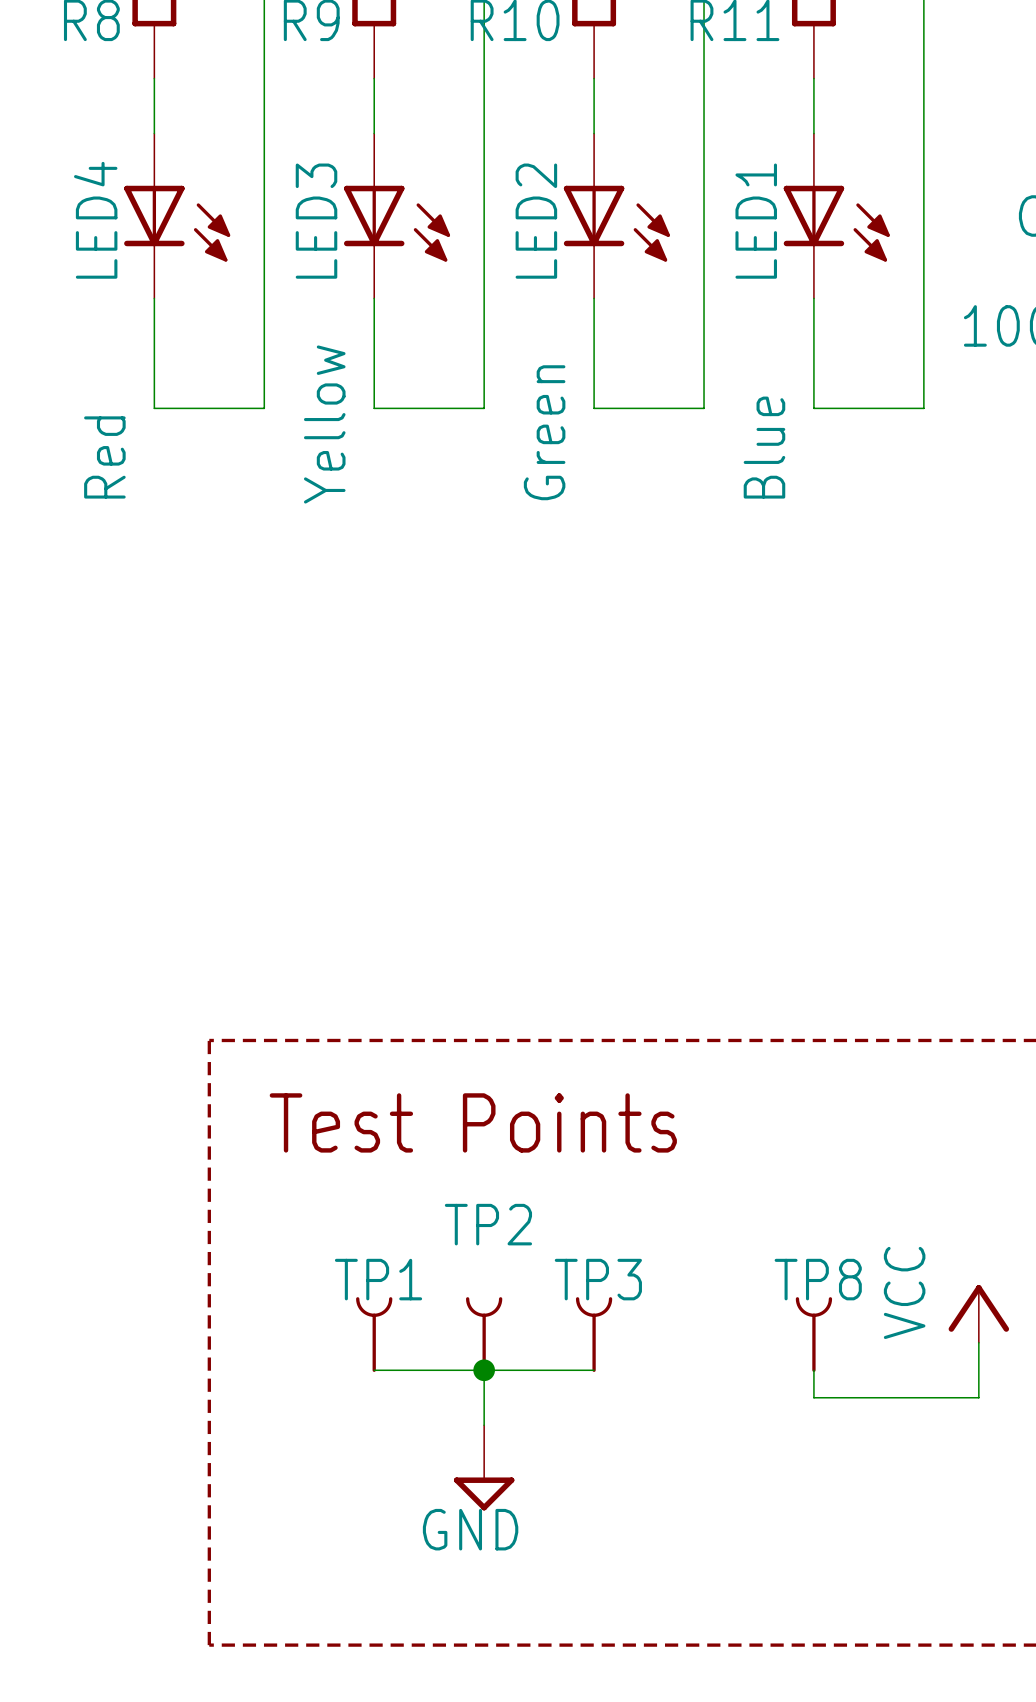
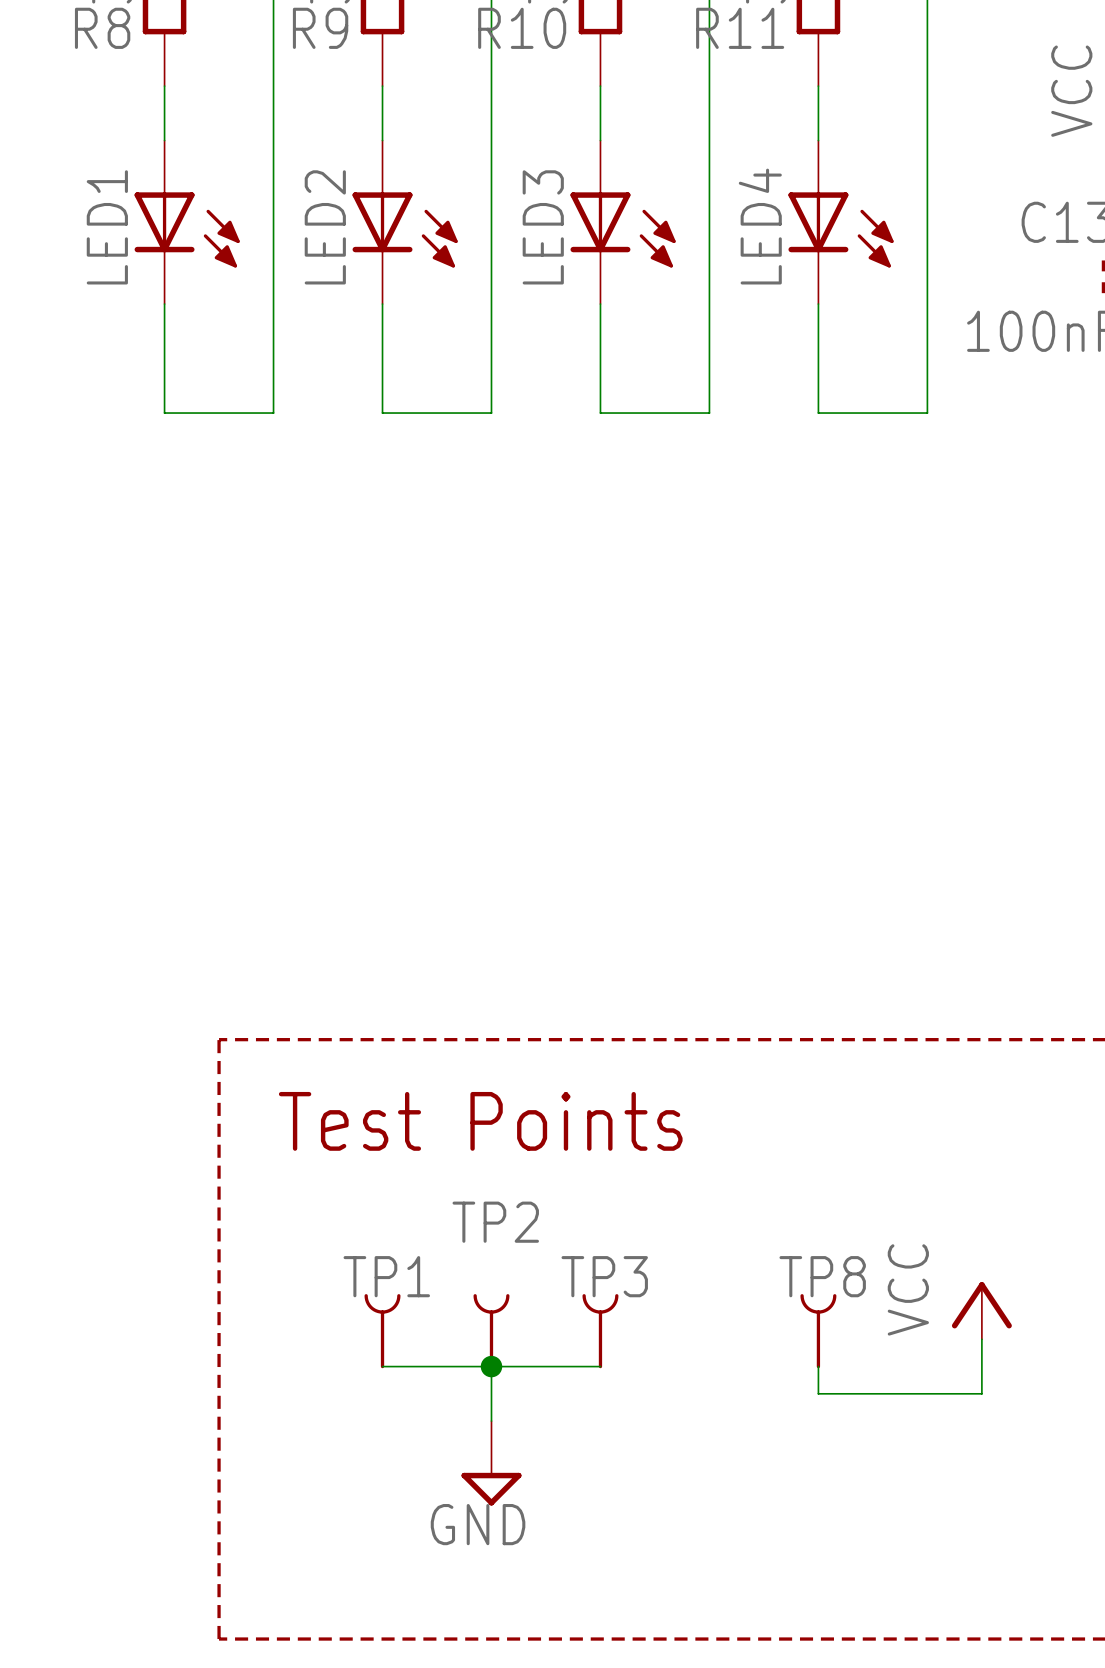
LED4 name: LED4 (95, 220) -> LED1 (107, 227)
LED3 name: LED3 (316, 221) -> LED2 (325, 227)
LED2 name: LED2 (536, 221) -> LED3 (543, 227)
LED1 name: LED1 (756, 221) -> LED4 (760, 226)
LED3 value: Yellow (324, 424) -> none
LED2 value: Green (544, 432) -> none
LED1 value: Blue (764, 447) -> none
LED4 value: Red (104, 457) -> none

